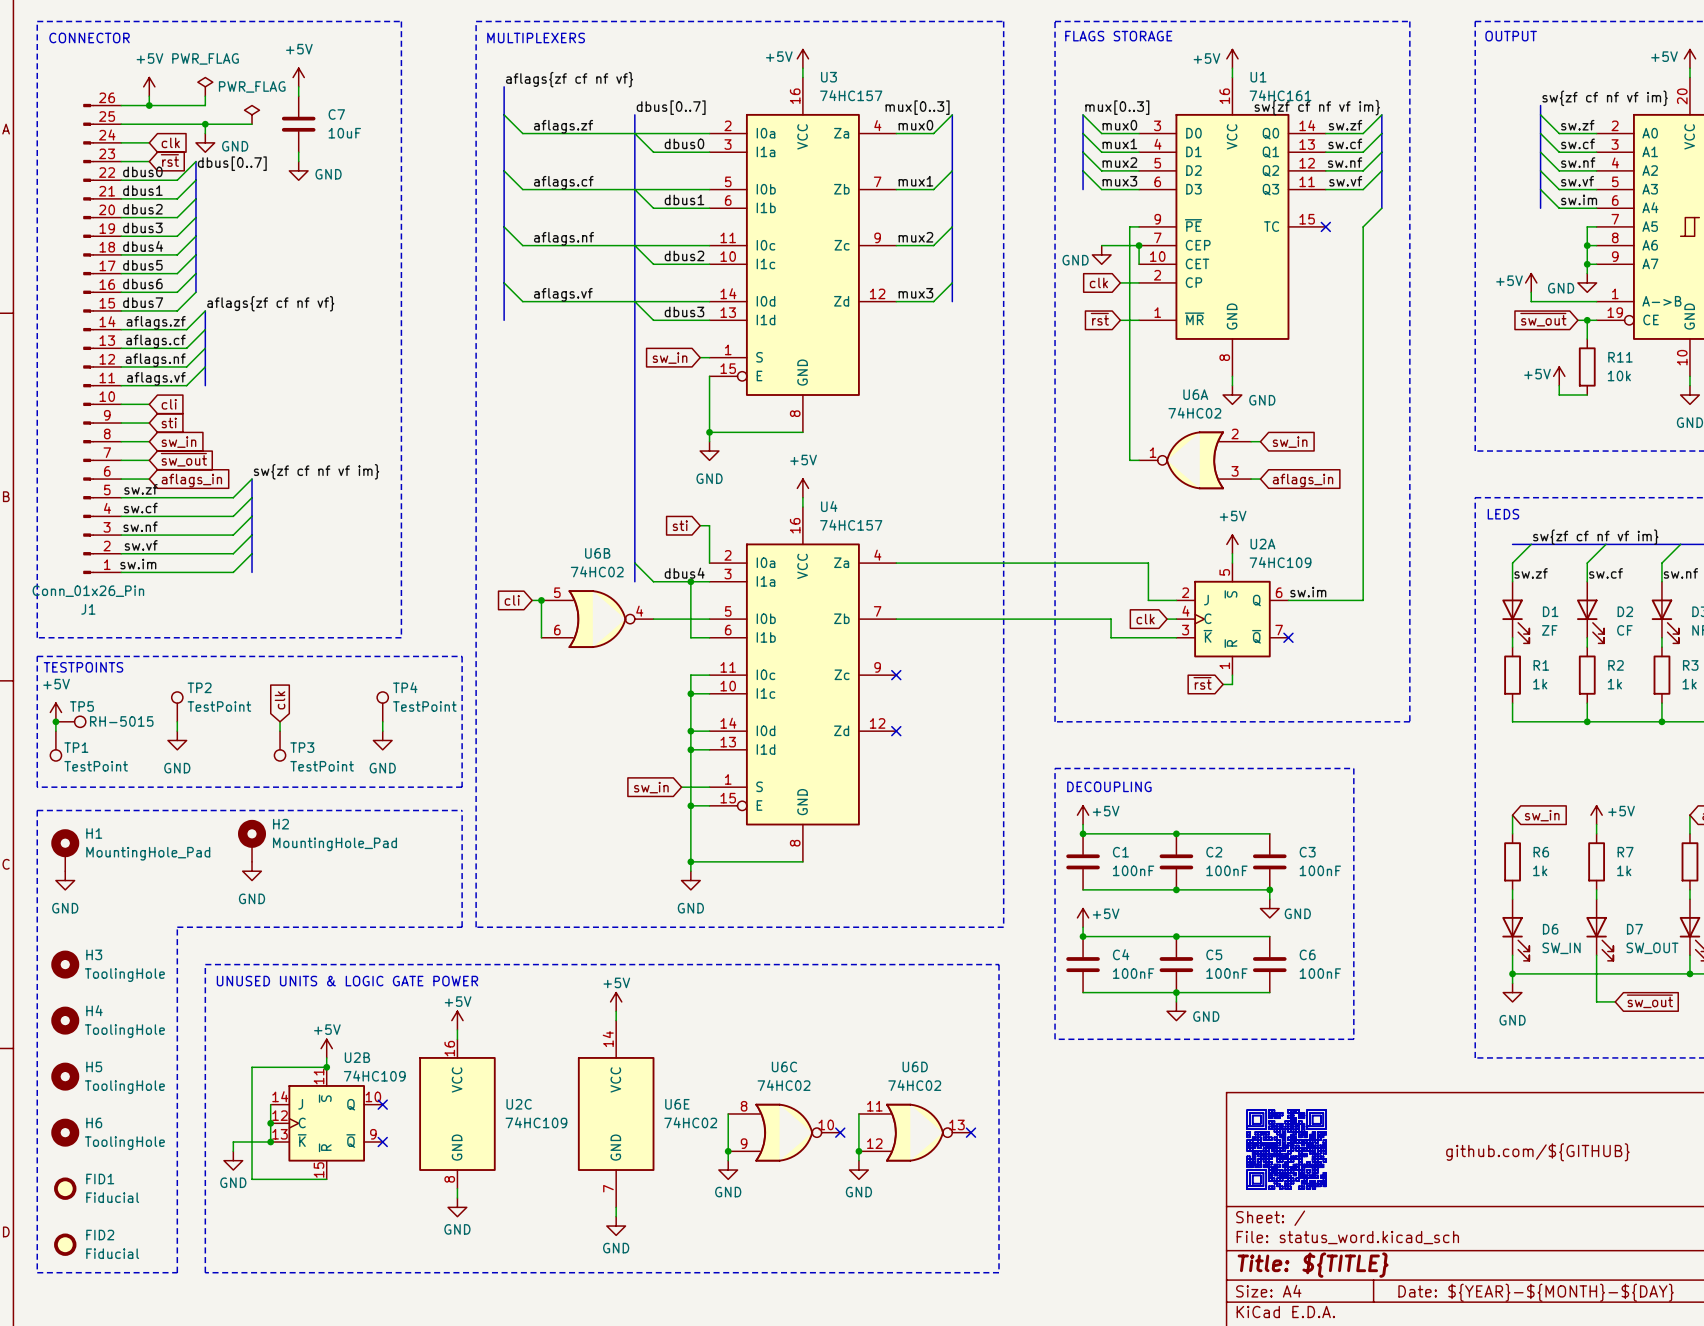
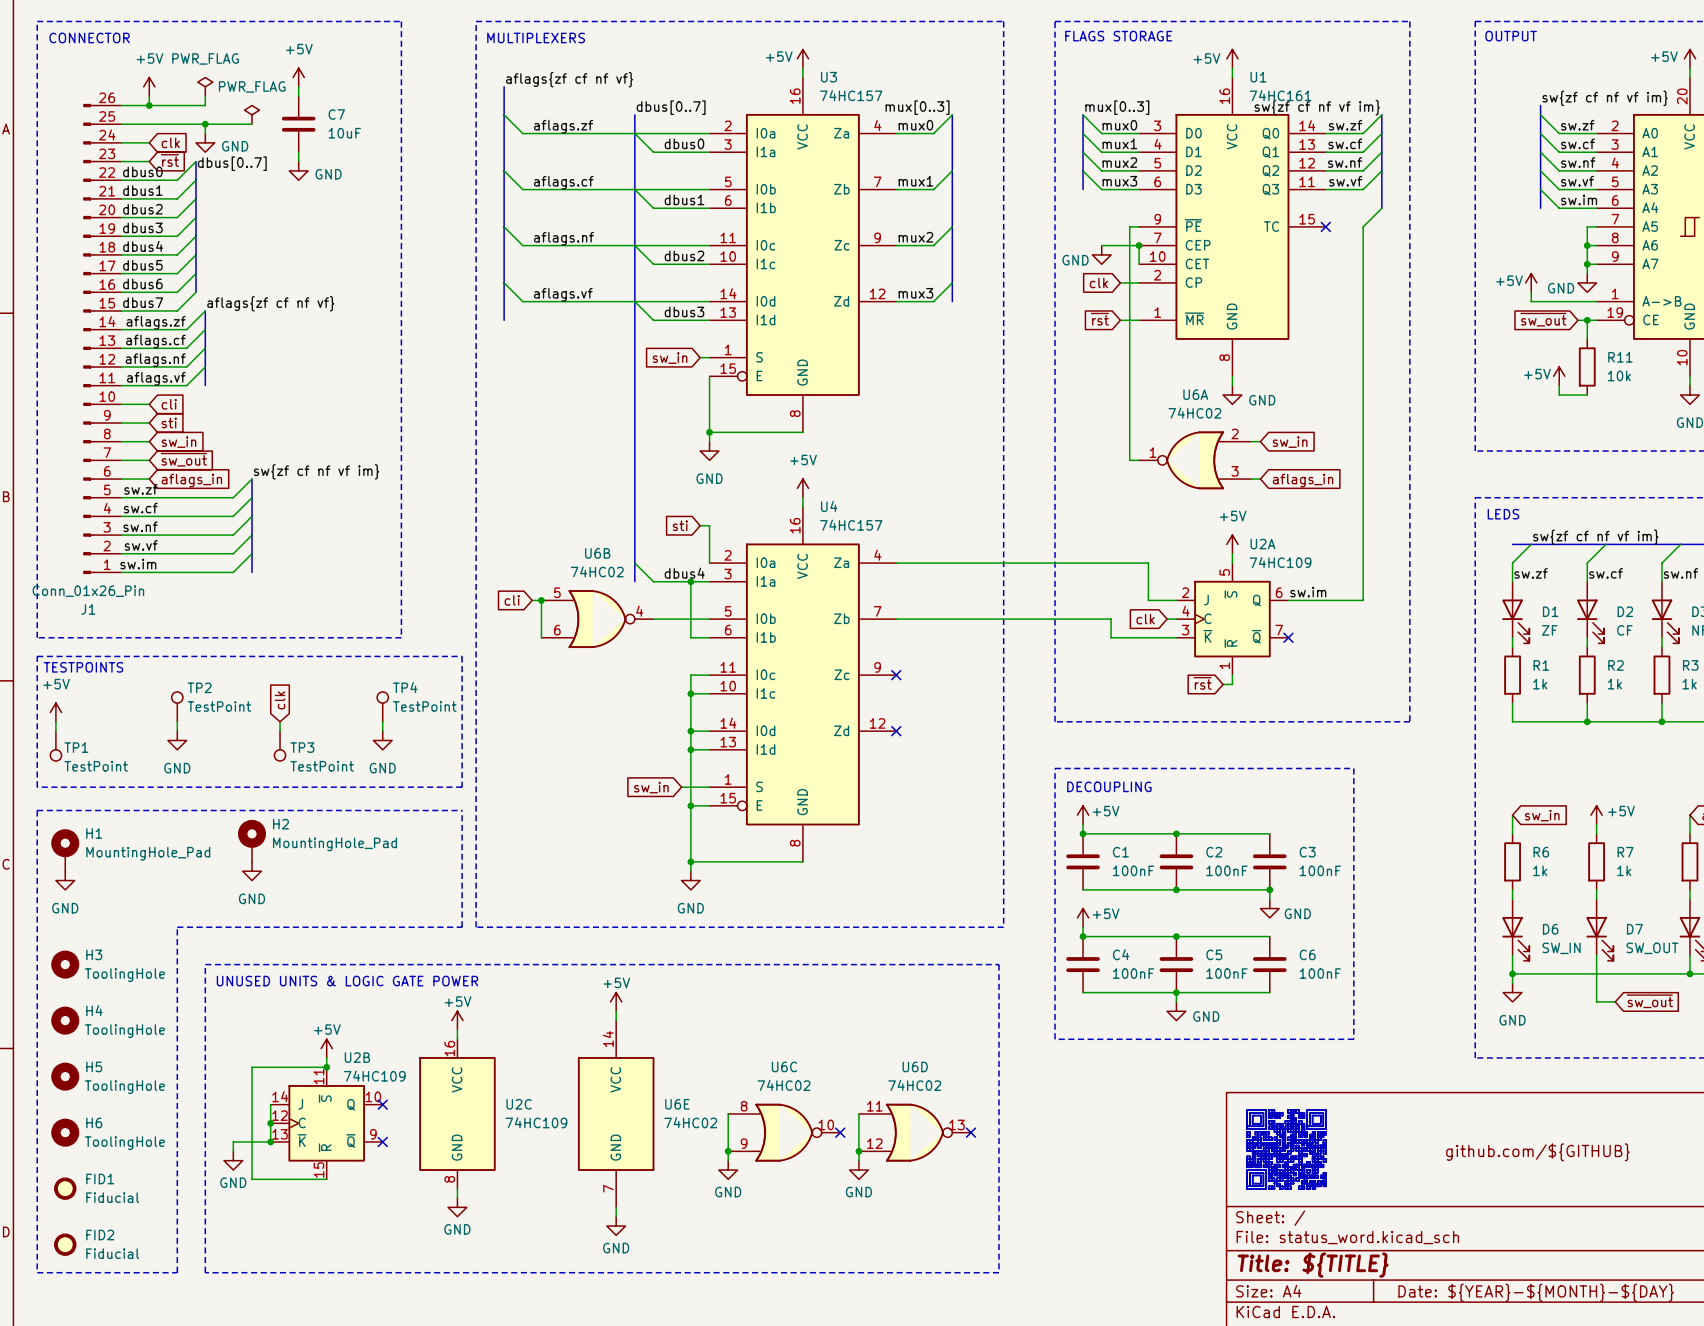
junction: (55, 721) -> none
TP5: RH-5015 (70, 721) -> none

